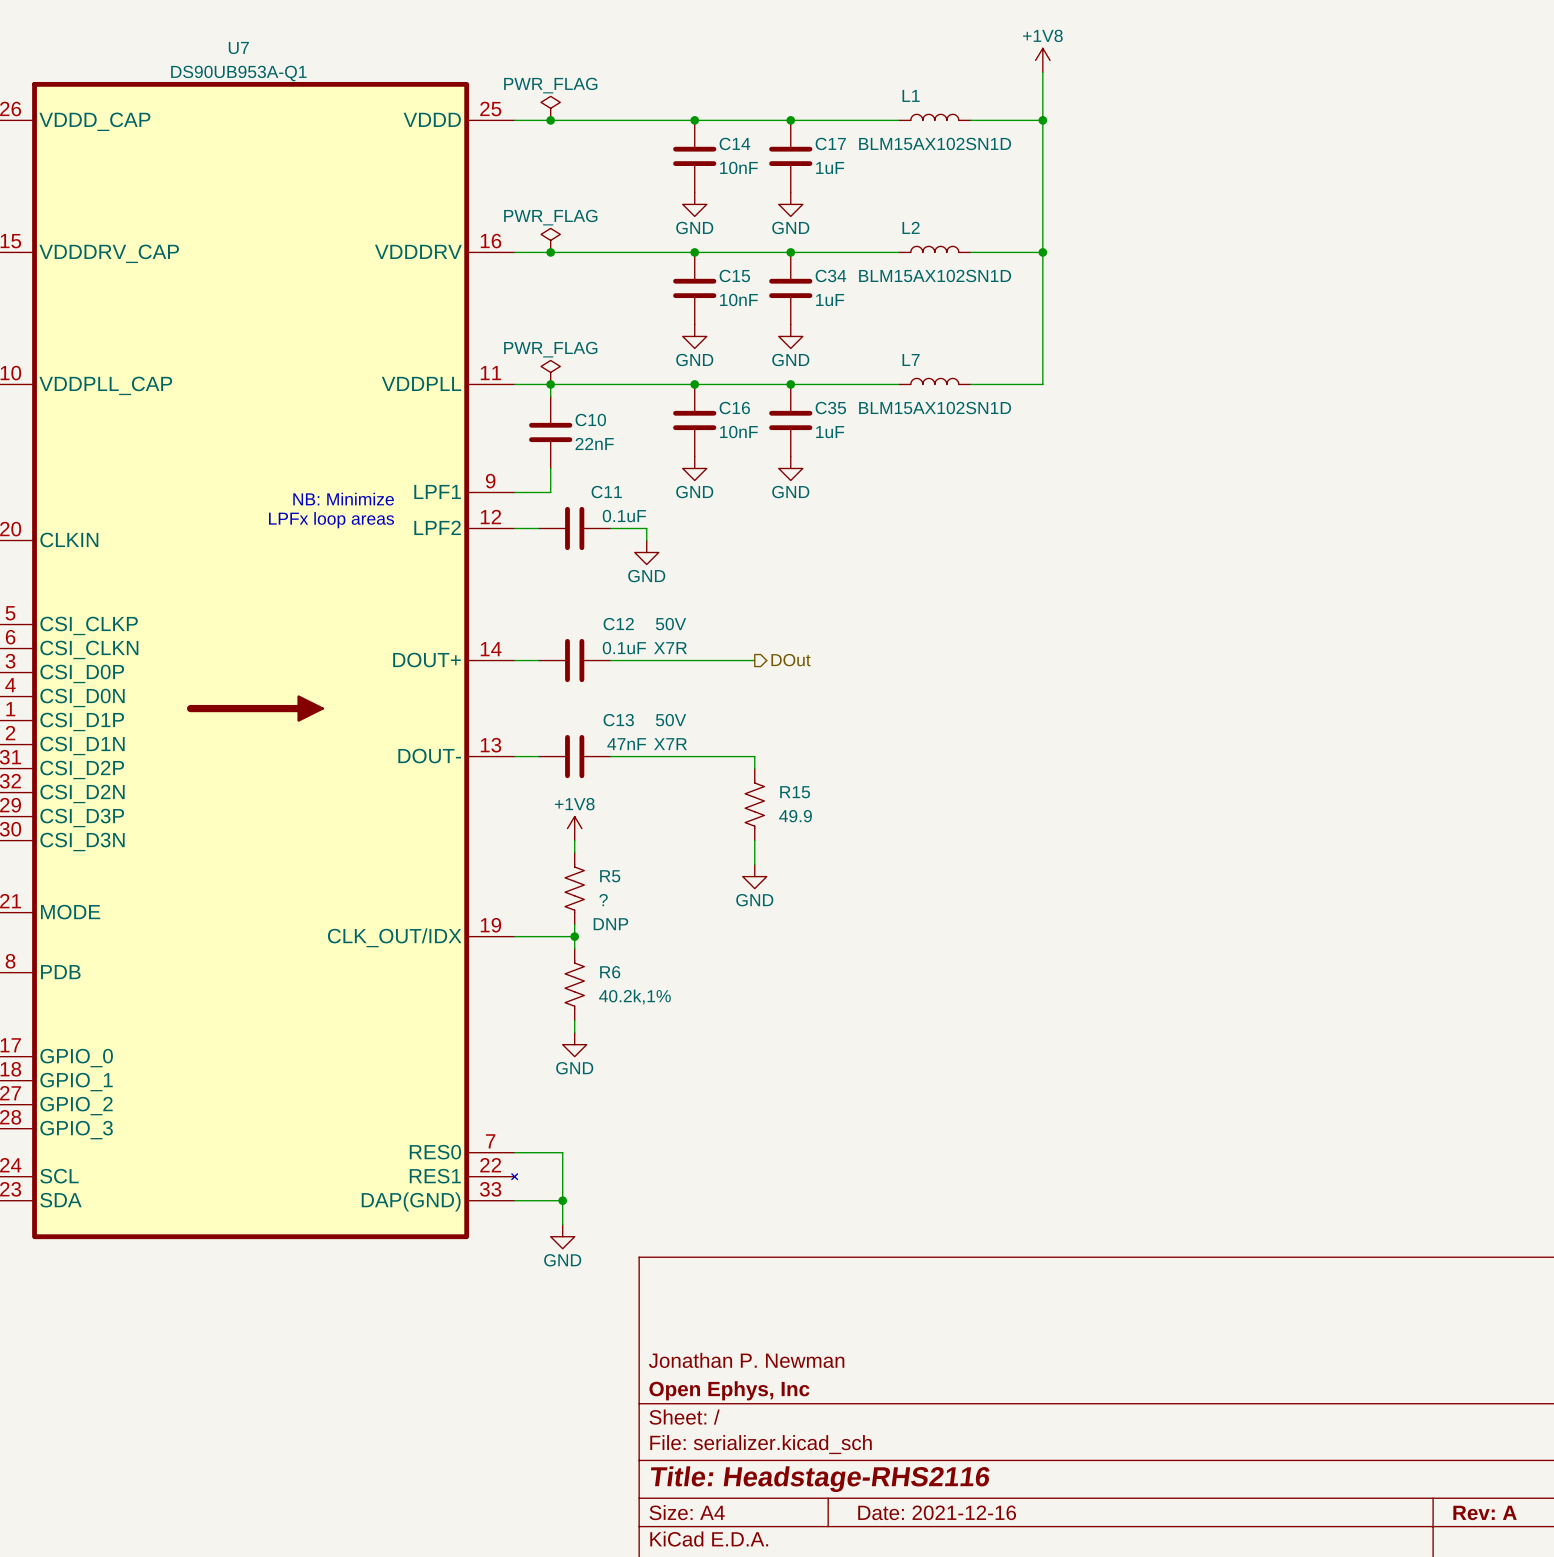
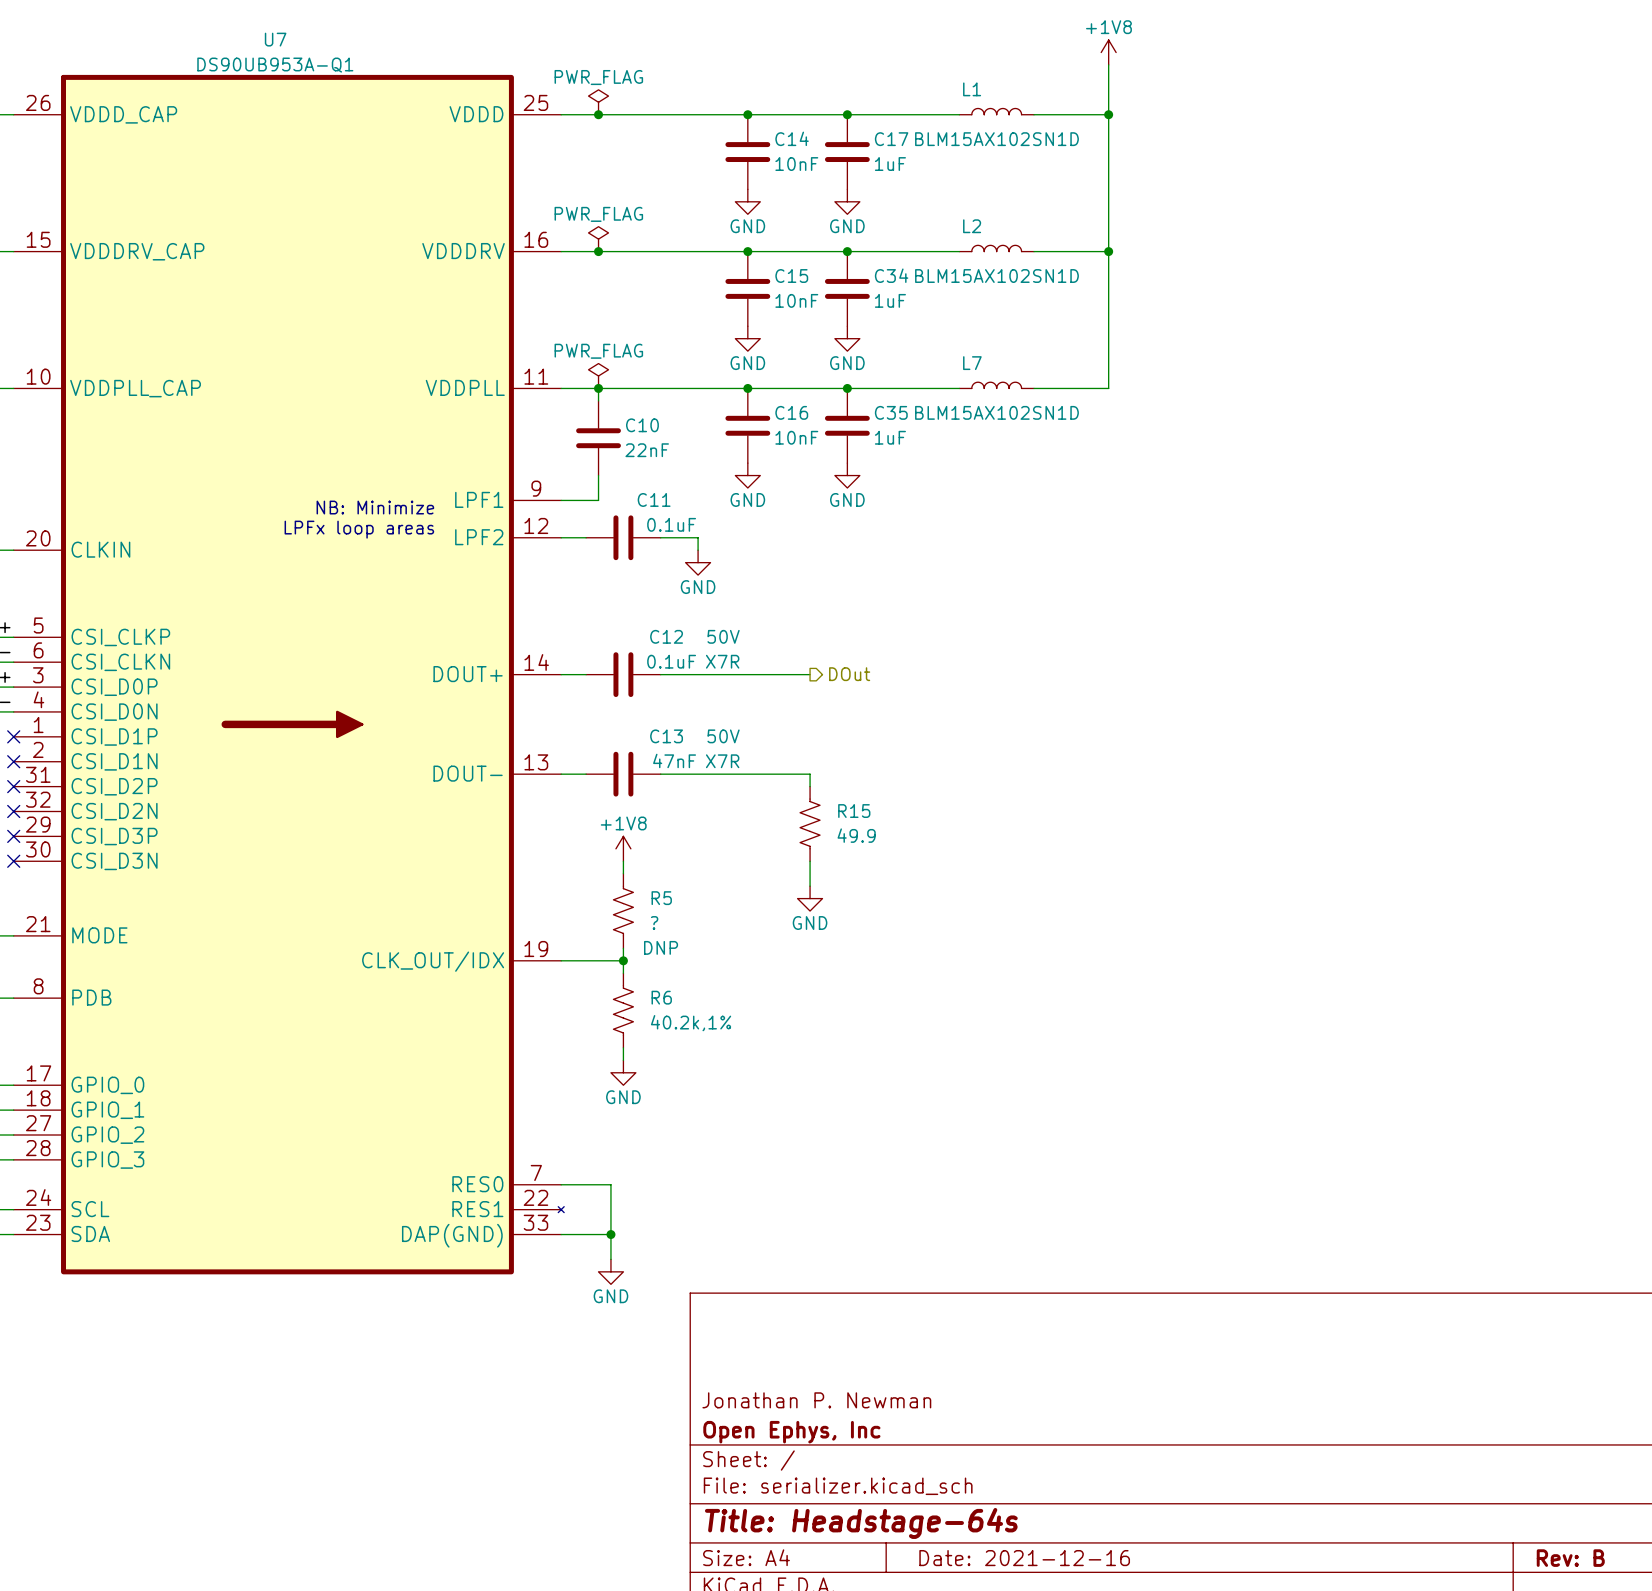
title block: Title: Headstage-RHS2116 (820, 1479) -> Title: Headstage-64s (861, 1523)
title block: Rev: A (1485, 1512) -> Rev: B (1570, 1558)

